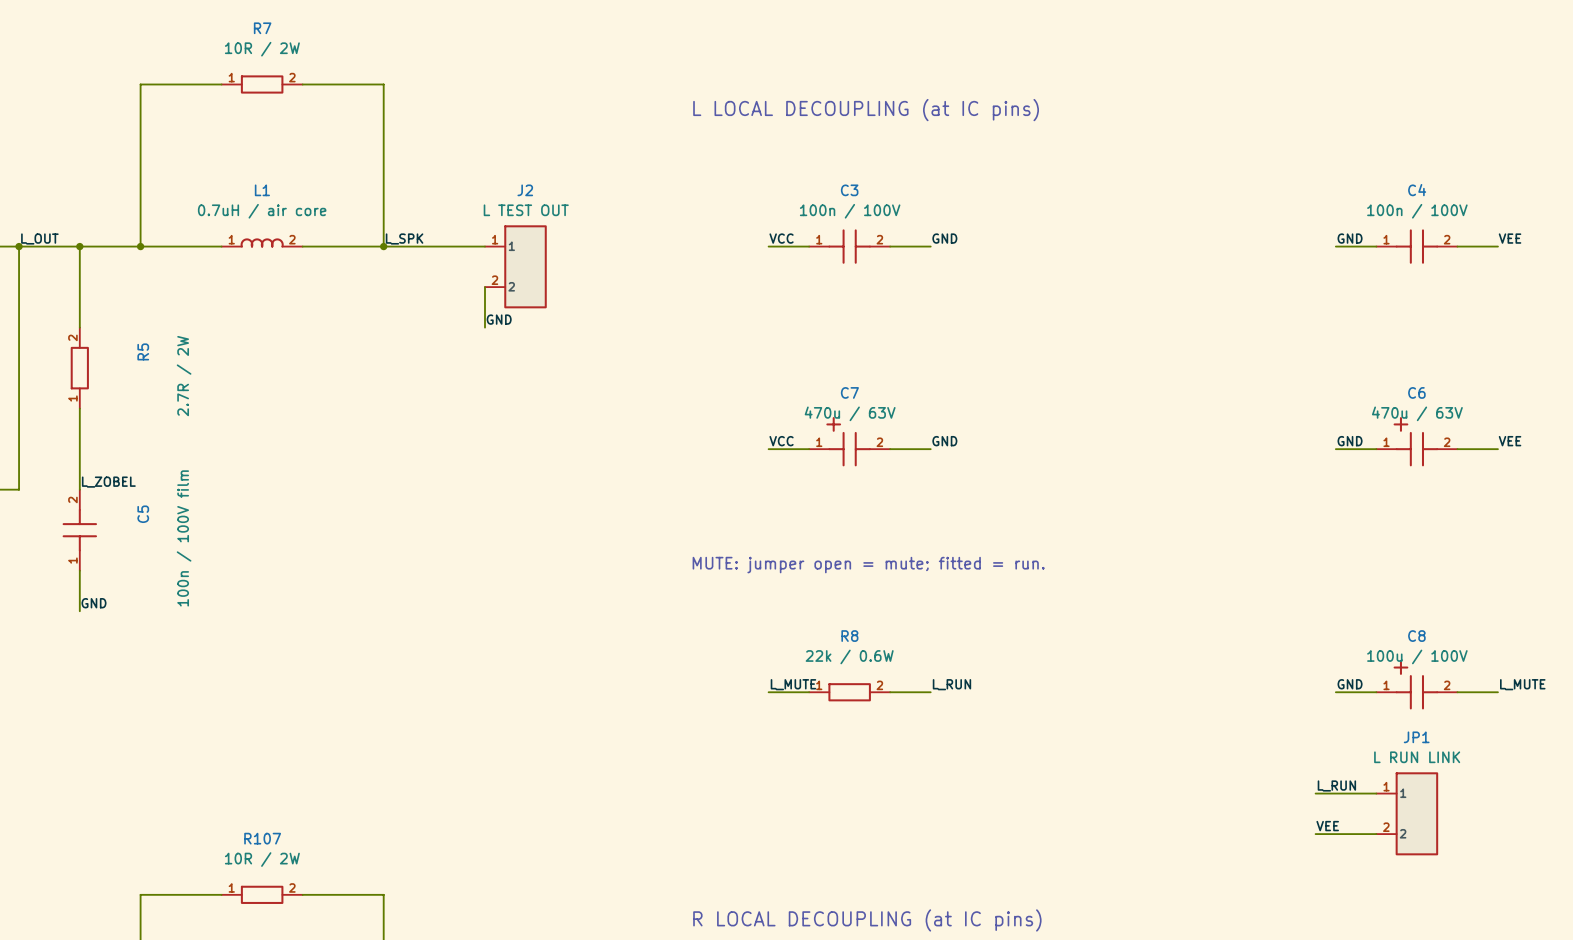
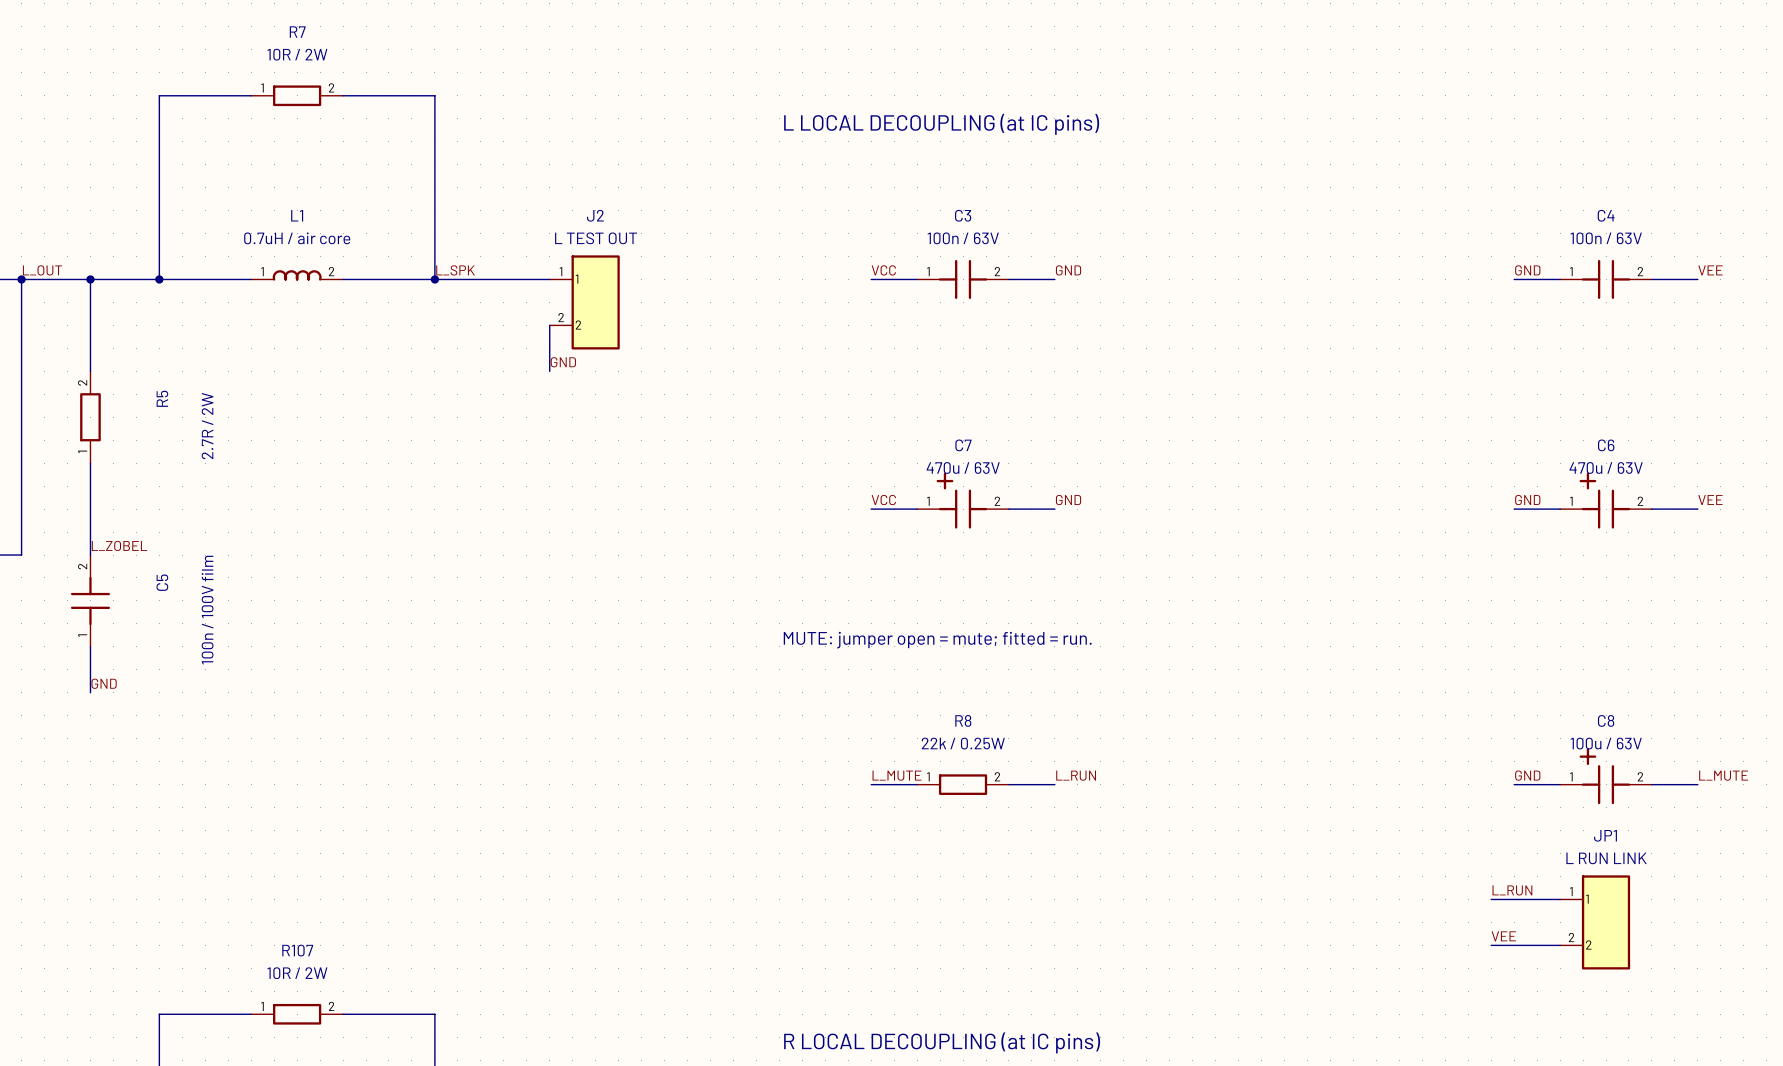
C3 value: 100n / 100V (850, 211) -> 100n / 63V (963, 238)
C4 value: 100n / 100V (1417, 211) -> 100n / 63V (1606, 238)
R8 value: 22k / 0.6W (849, 656) -> 22k / 0.25W (963, 743)
C8 value: 100u / 100V (1417, 656) -> 100u / 63V (1606, 743)

